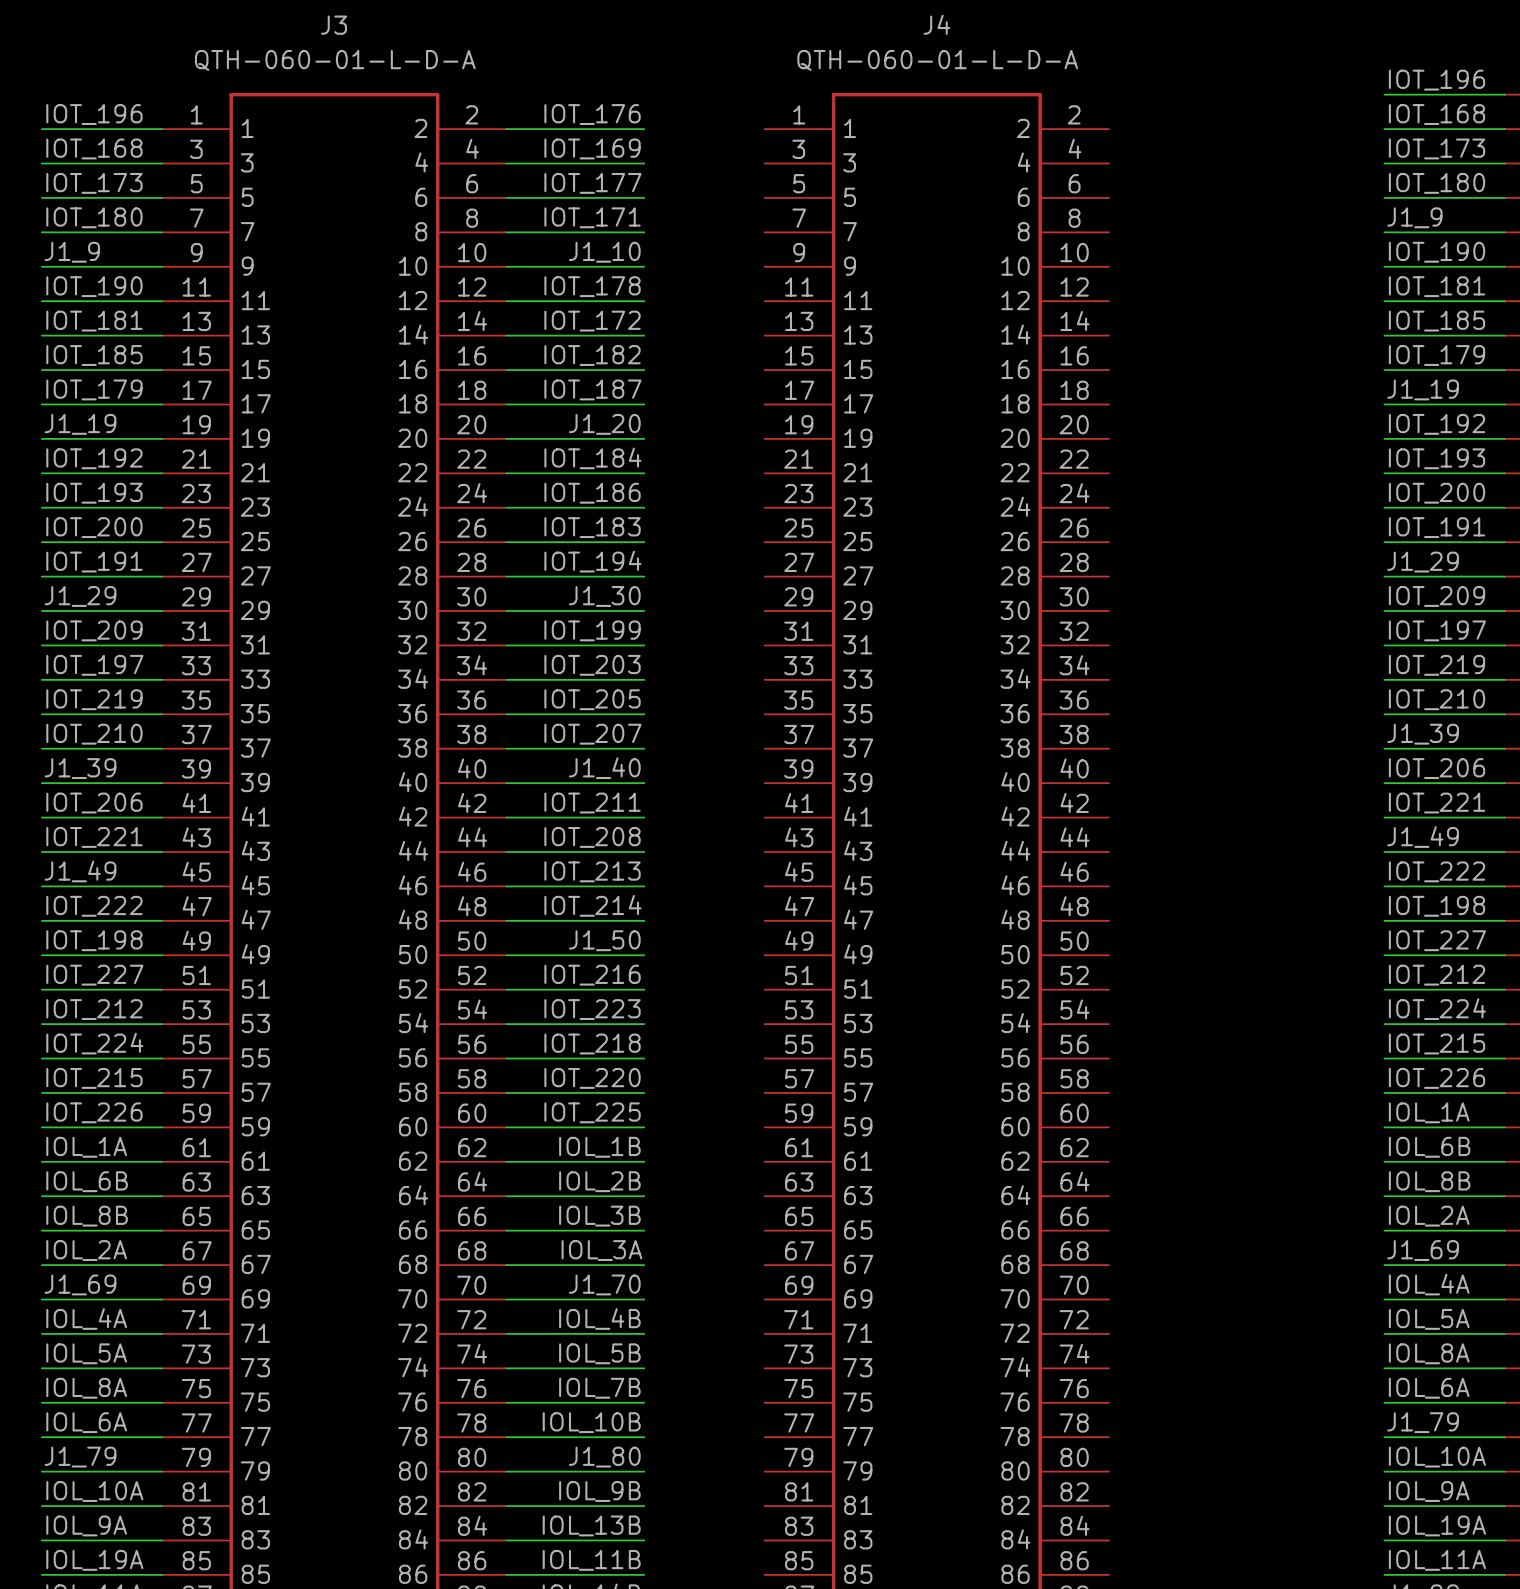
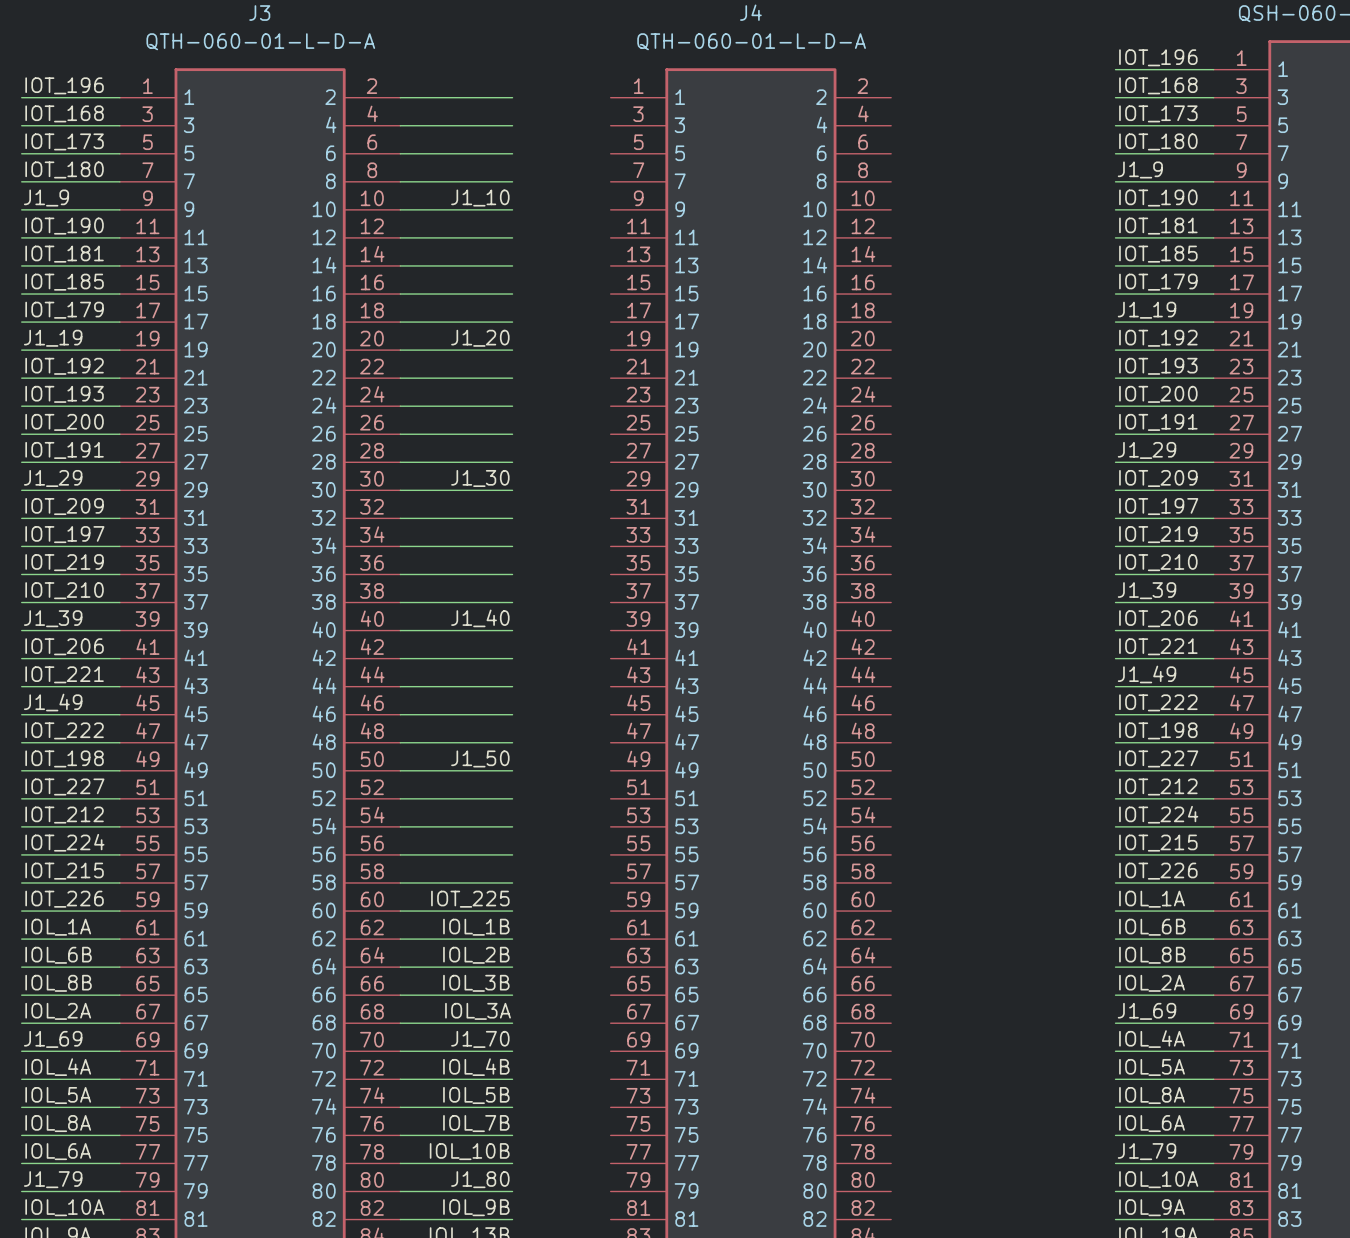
label: IOT_176 (592, 114) -> none
label: IOT_169 (592, 148) -> none
label: IOT_177 (592, 183) -> none
label: IOT_171 (592, 217) -> none
label: IOT_178 (592, 286) -> none
label: IOT_172 (592, 321) -> none
label: IOT_182 (592, 355) -> none
label: IOT_187 (592, 389) -> none
label: IOT_184 (592, 458) -> none
label: IOT_186 (592, 493) -> none
label: IOT_183 (592, 527) -> none
label: IOT_194 (592, 561) -> none
label: IOT_199 (592, 630) -> none
label: IOT_203 (592, 665) -> none
label: IOT_205 (592, 699) -> none
label: IOT_207 (592, 734) -> none
label: IOT_211 (592, 803) -> none
label: IOT_208 (592, 837) -> none
label: IOT_213 (592, 871) -> none
label: IOT_214 (592, 905) -> none
label: IOT_216 (592, 975) -> none
label: IOT_223 (592, 1009) -> none
label: IOT_218 (592, 1043) -> none
label: IOT_220 (592, 1078) -> none

